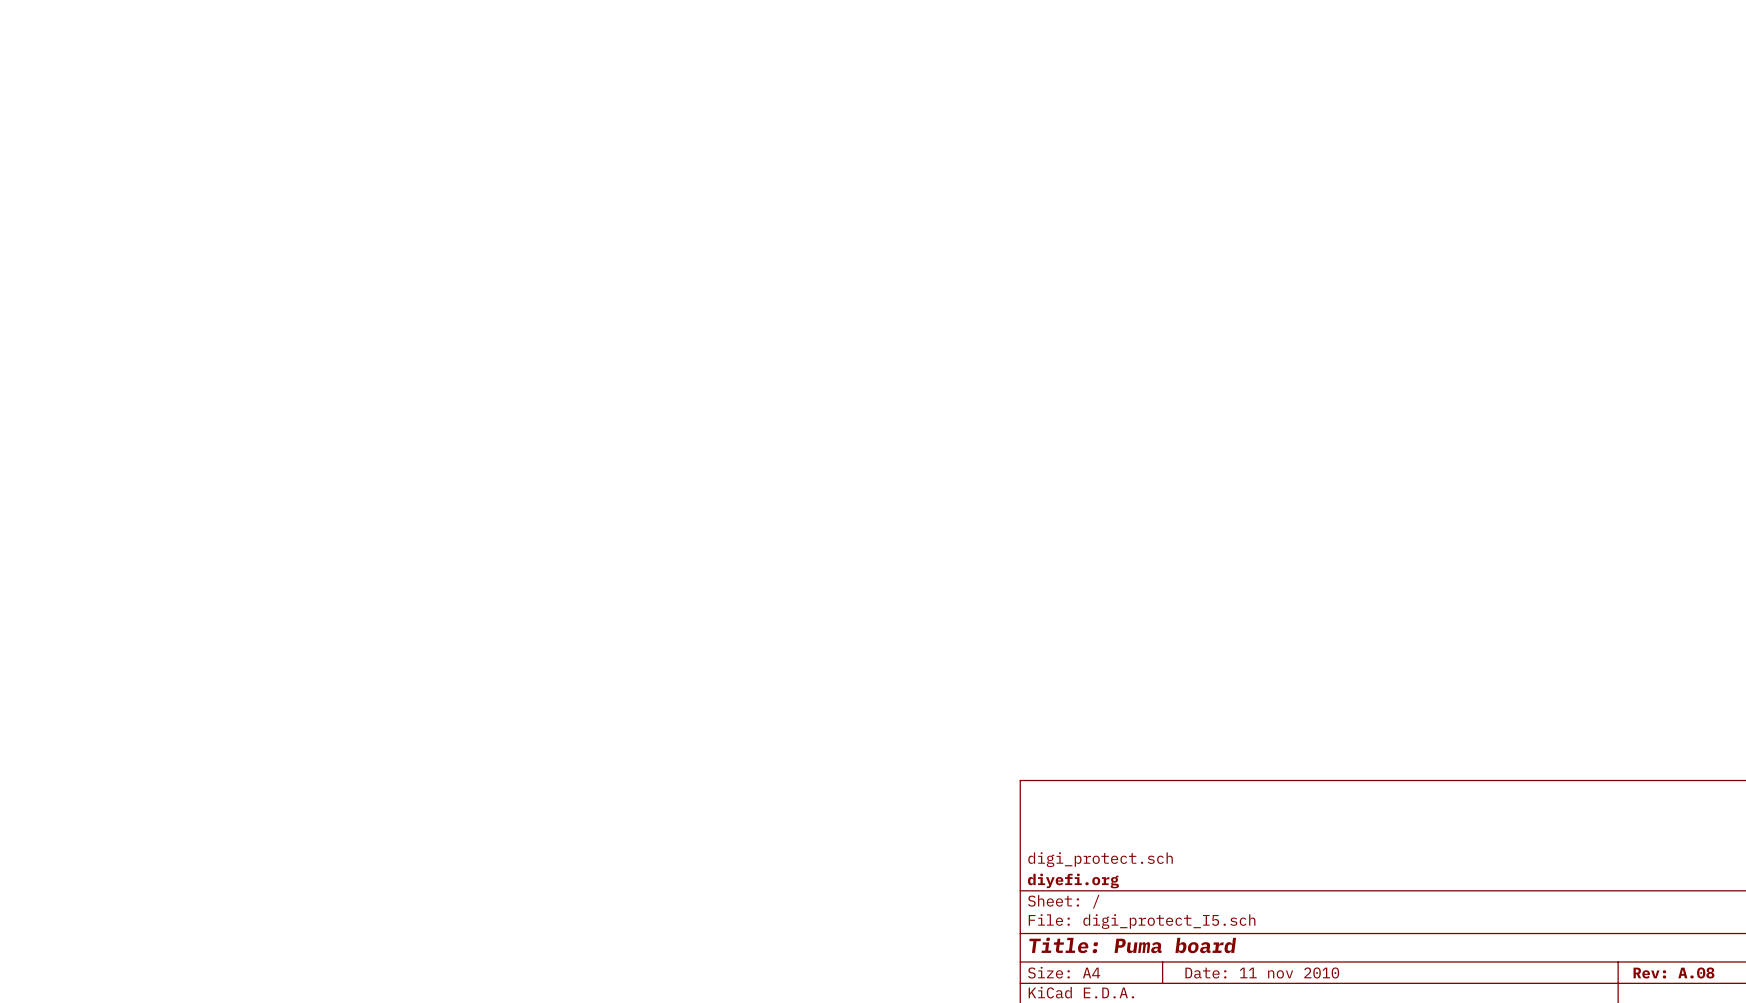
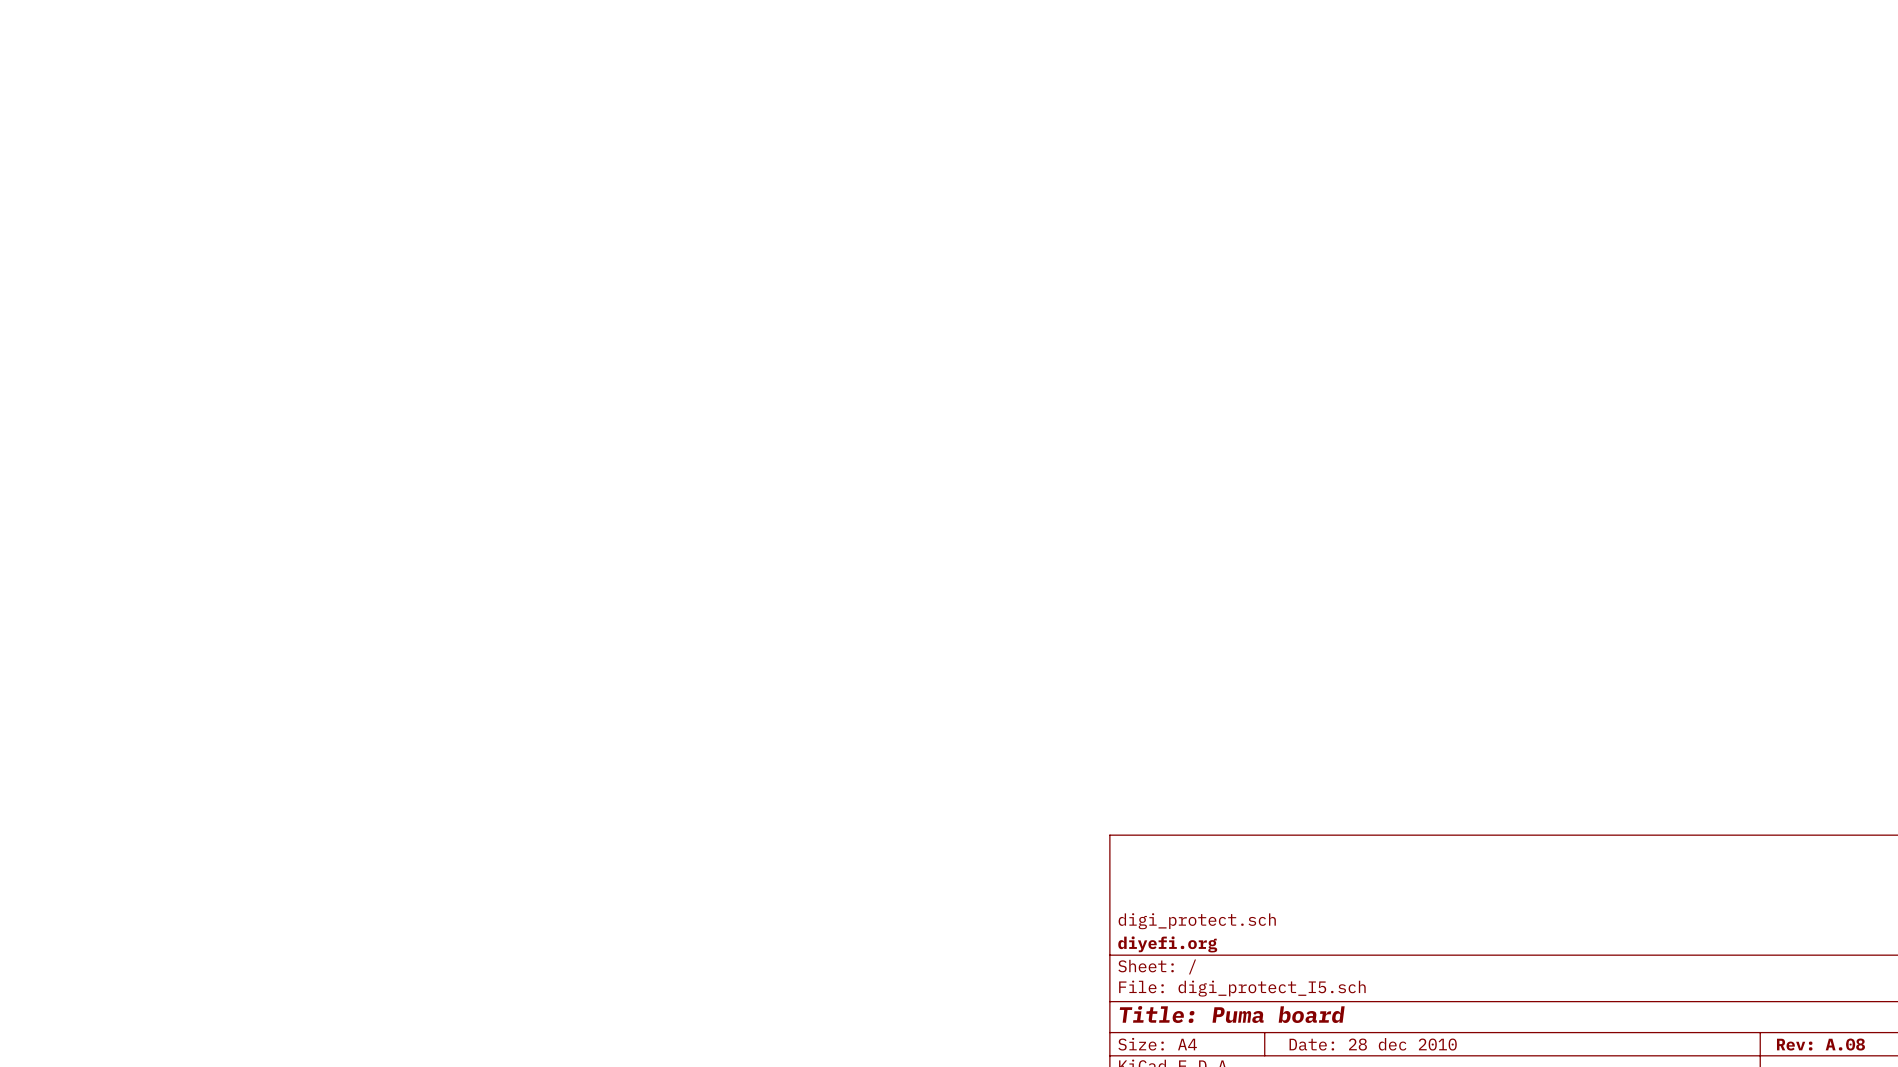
title block: Date: 11 nov 2010 (1262, 972) -> Date: 28 dec 2010 (1373, 1044)

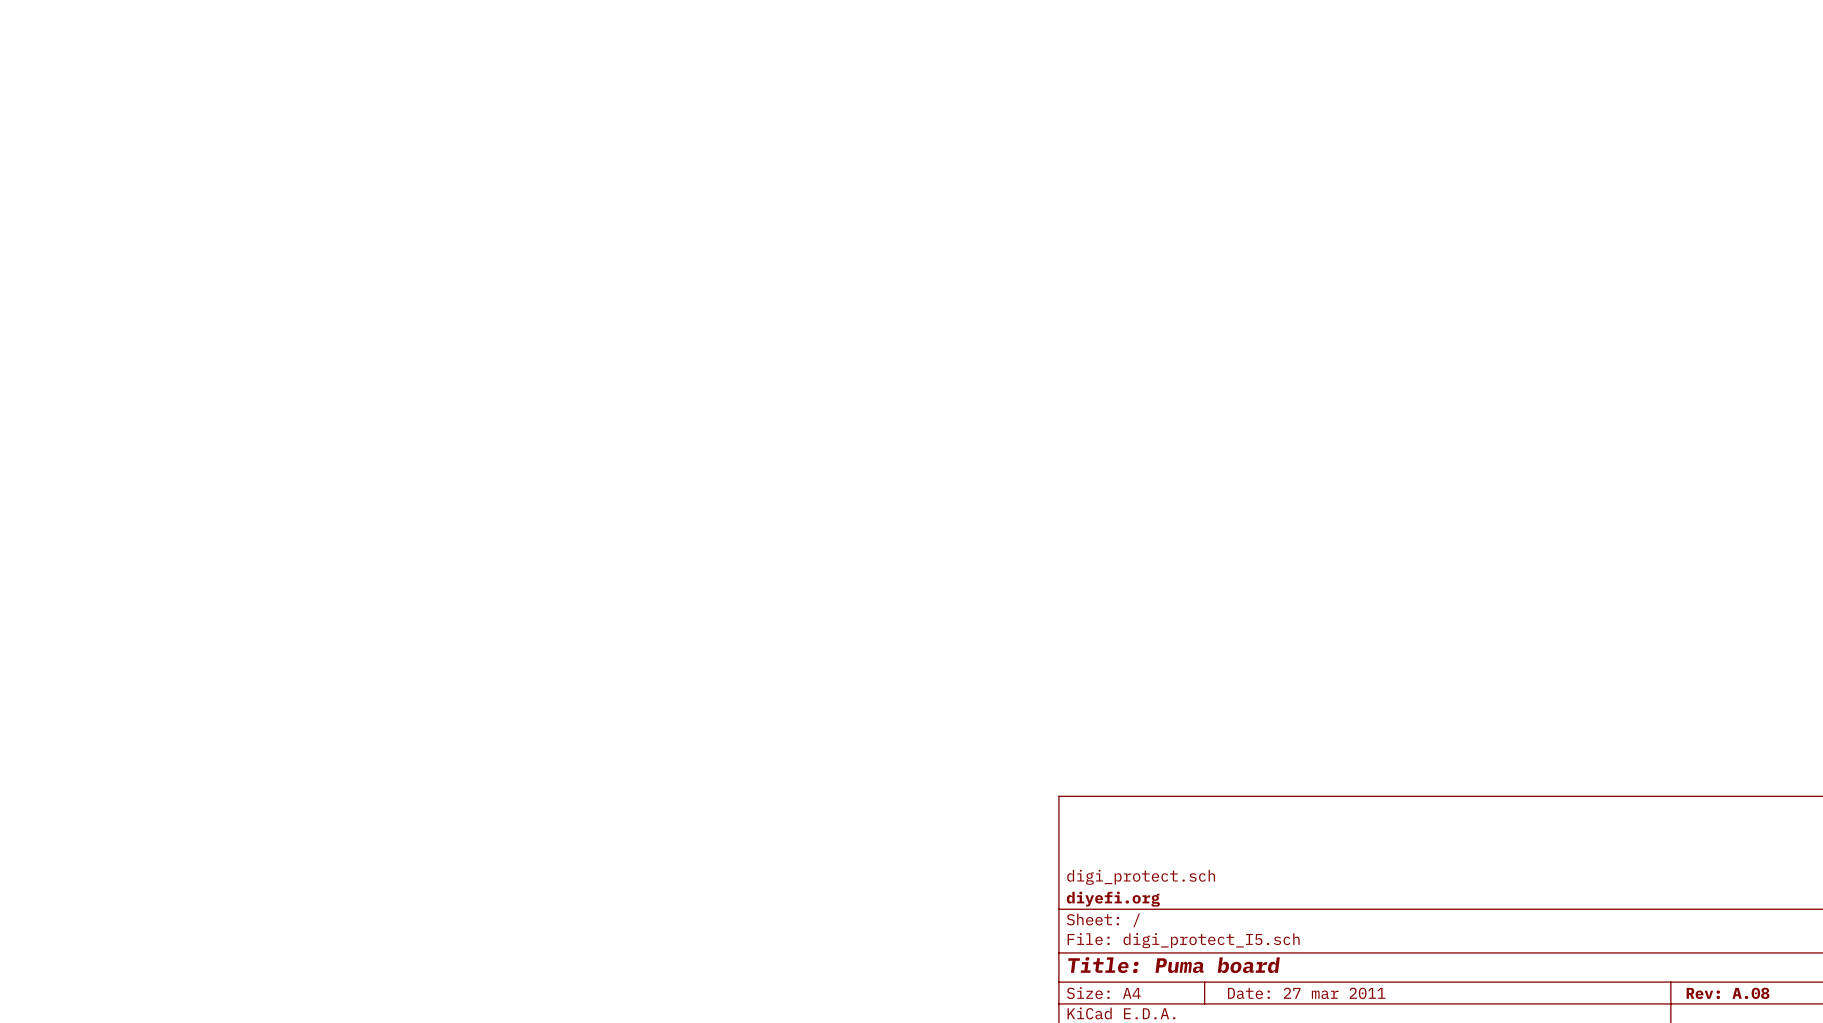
title block: Date: 28 dec 2010 (1373, 1044) -> Date: 27 mar 2011 (1306, 993)

